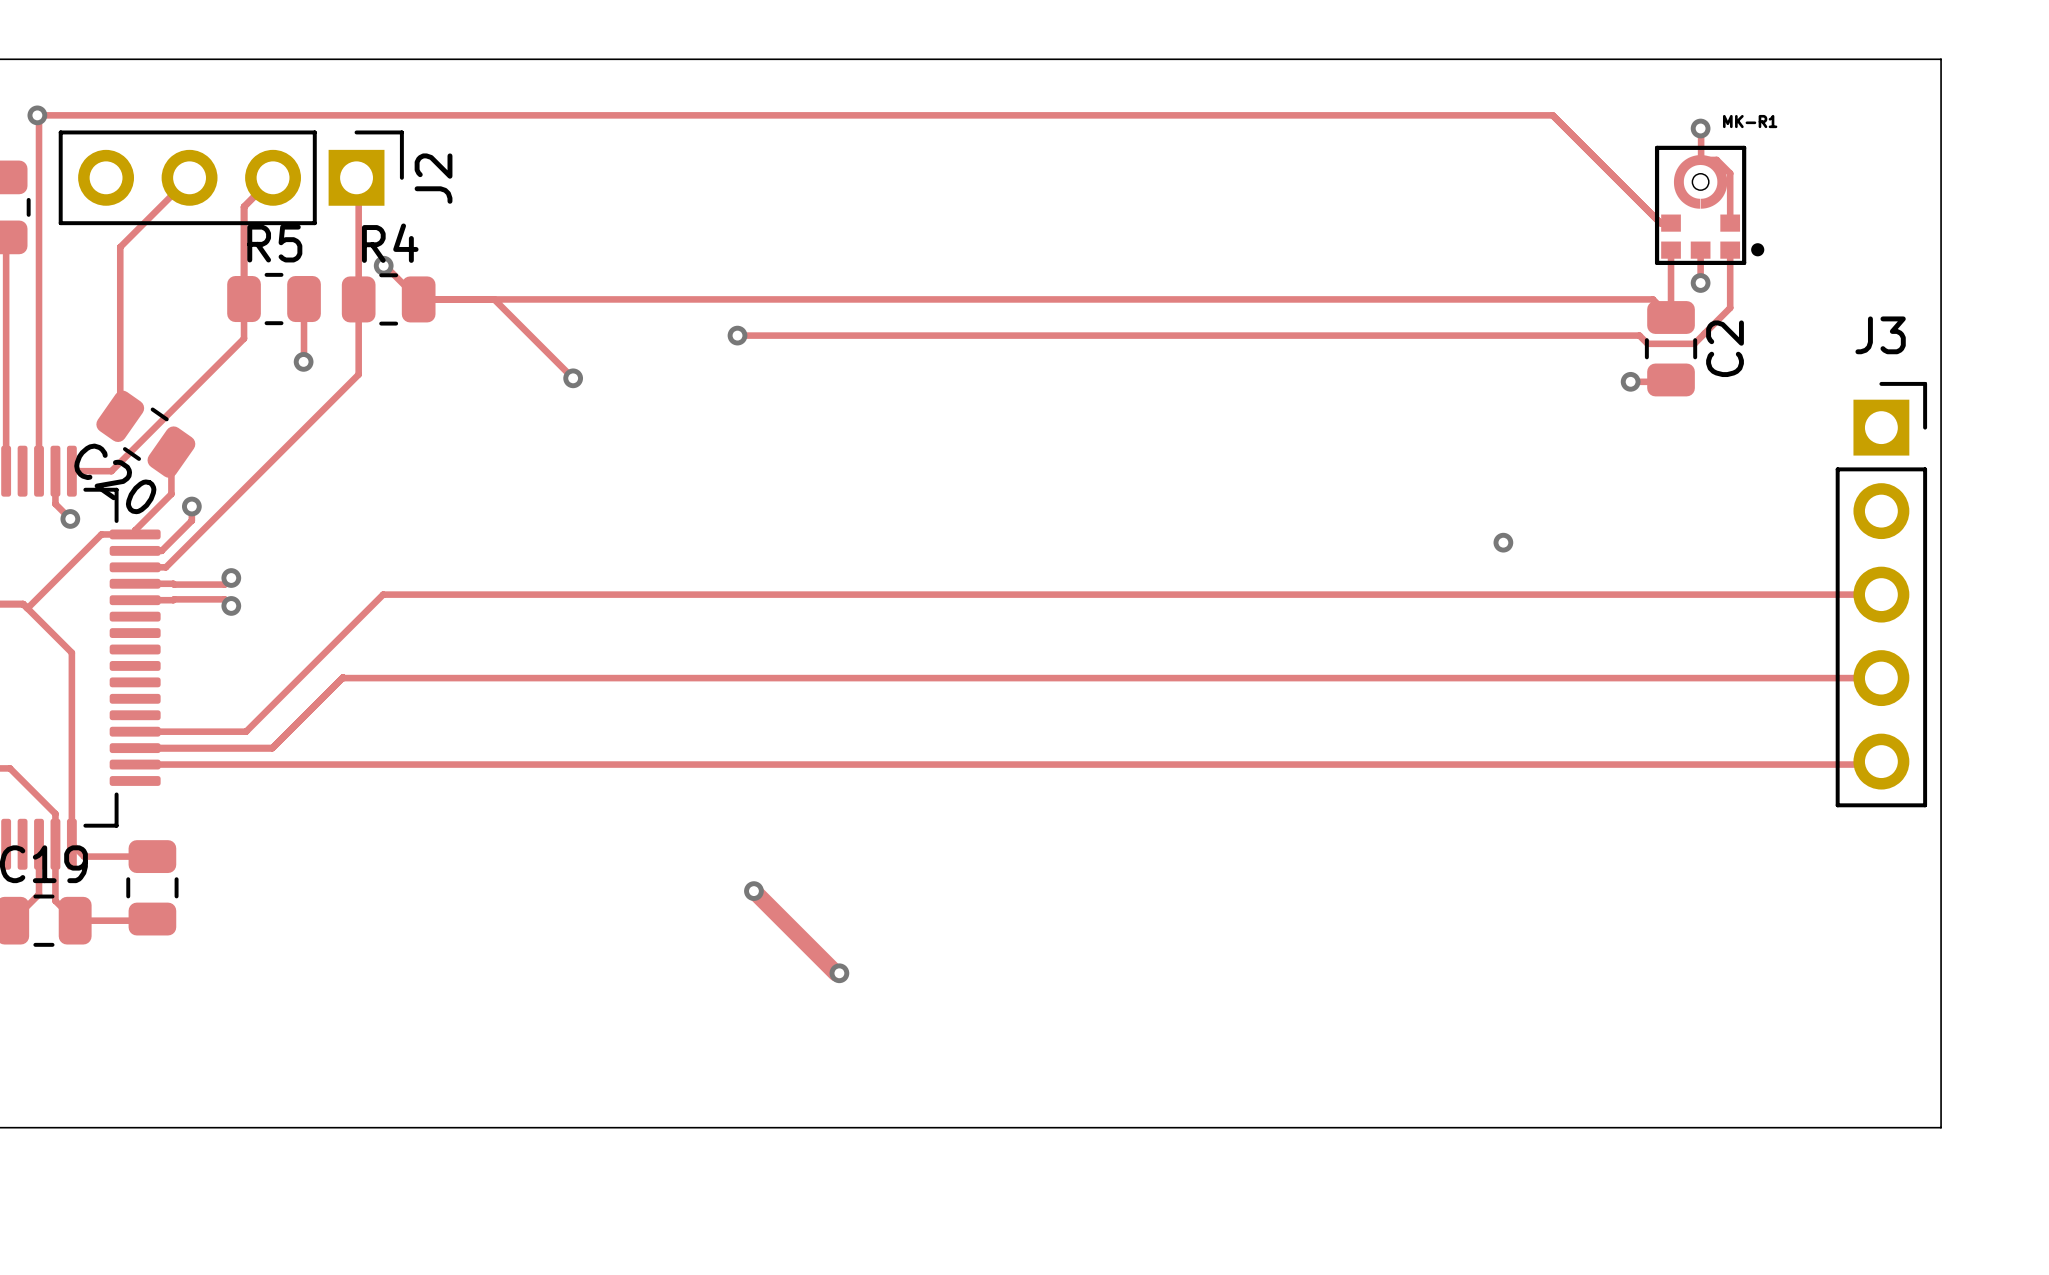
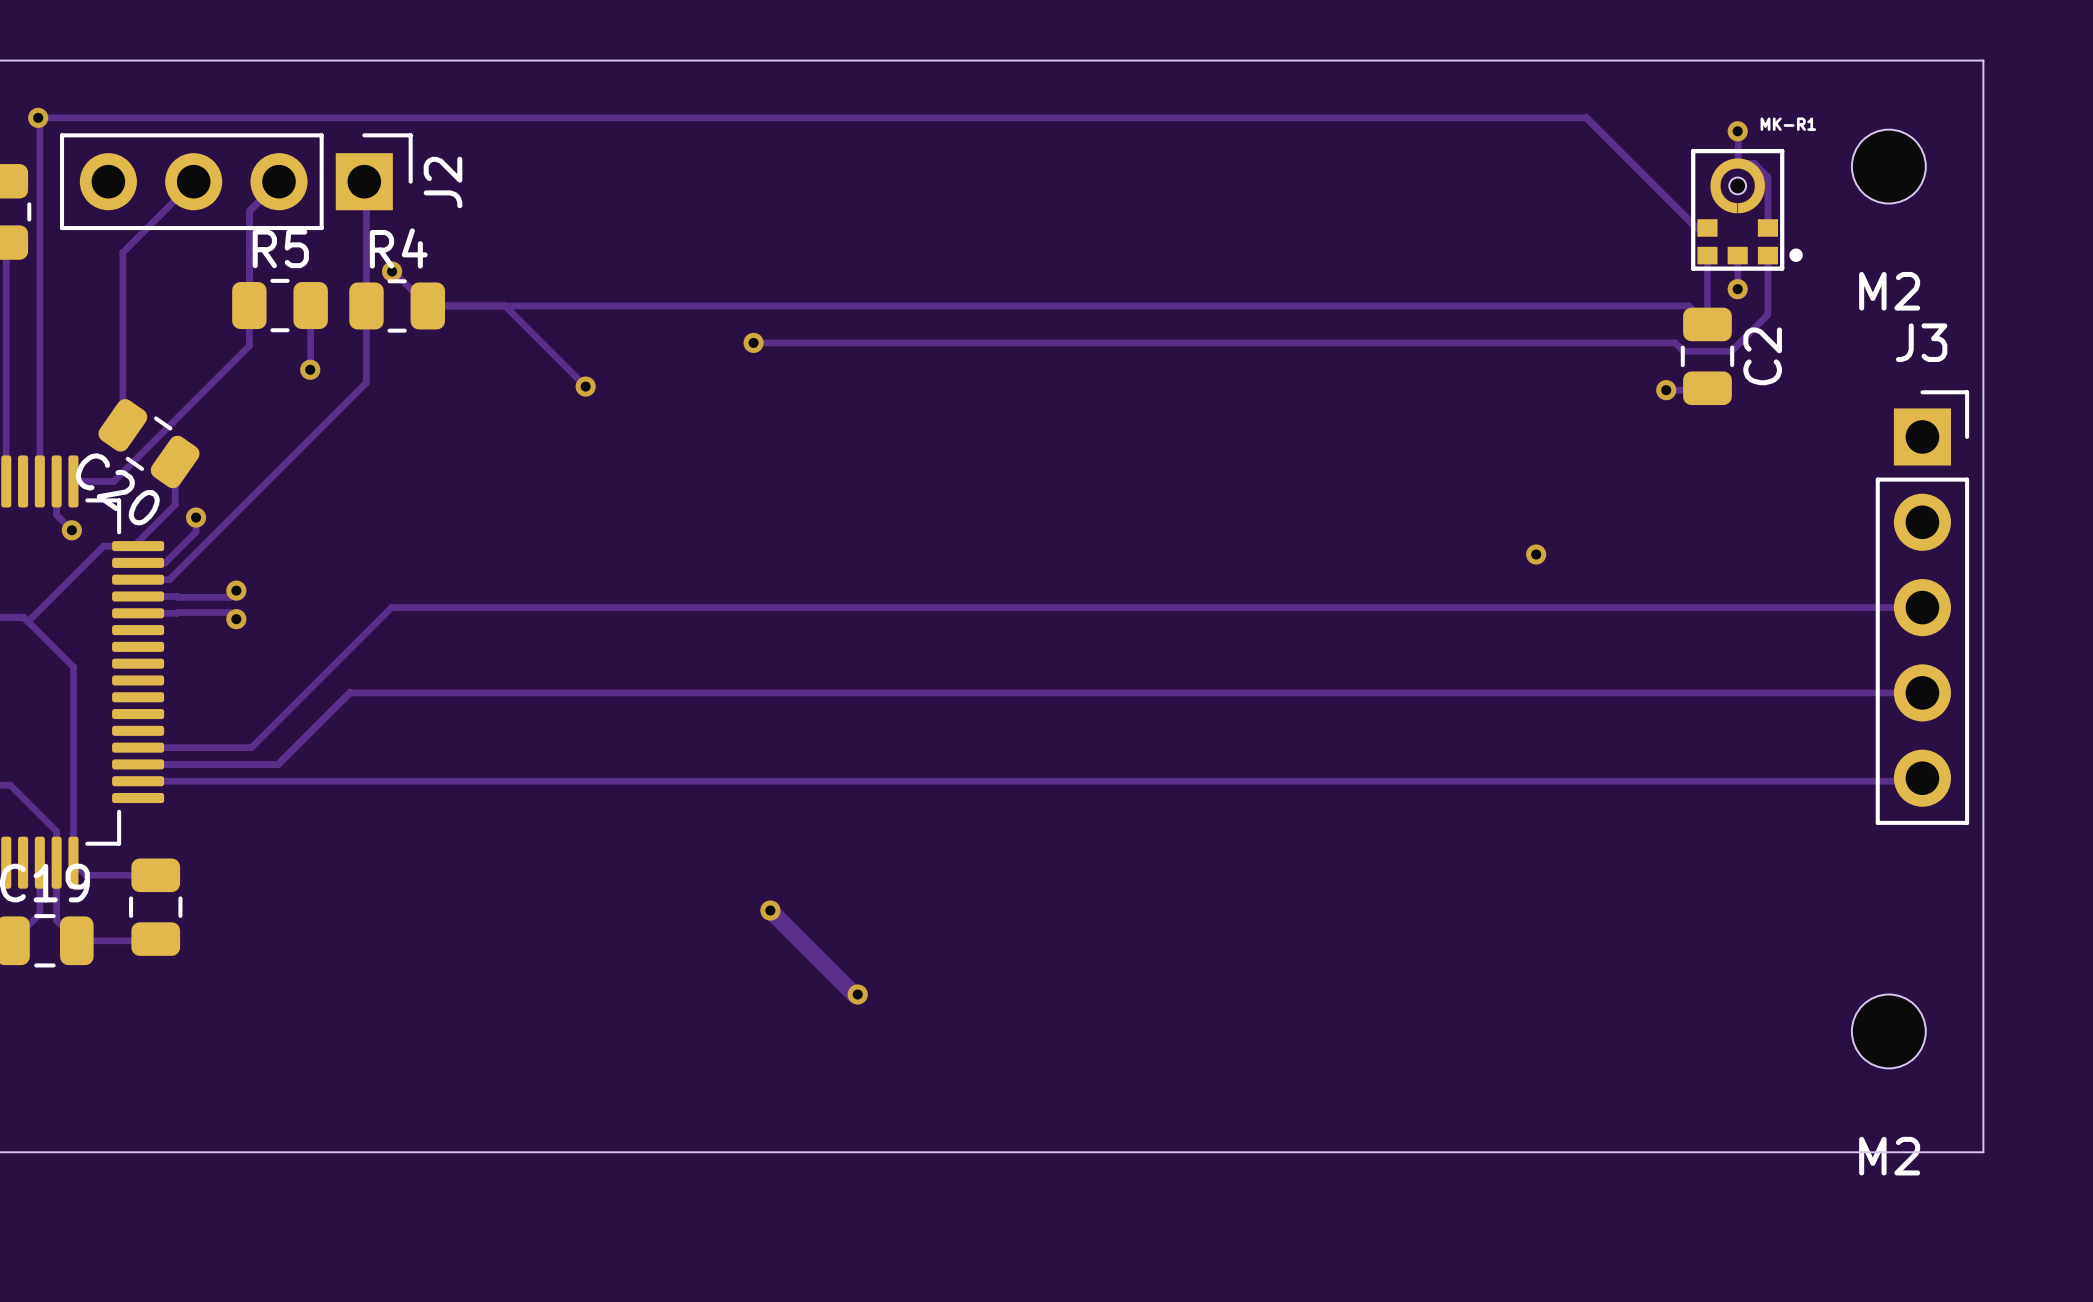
M2: none -> (1888, 166)
M2: none -> (1888, 1031)

